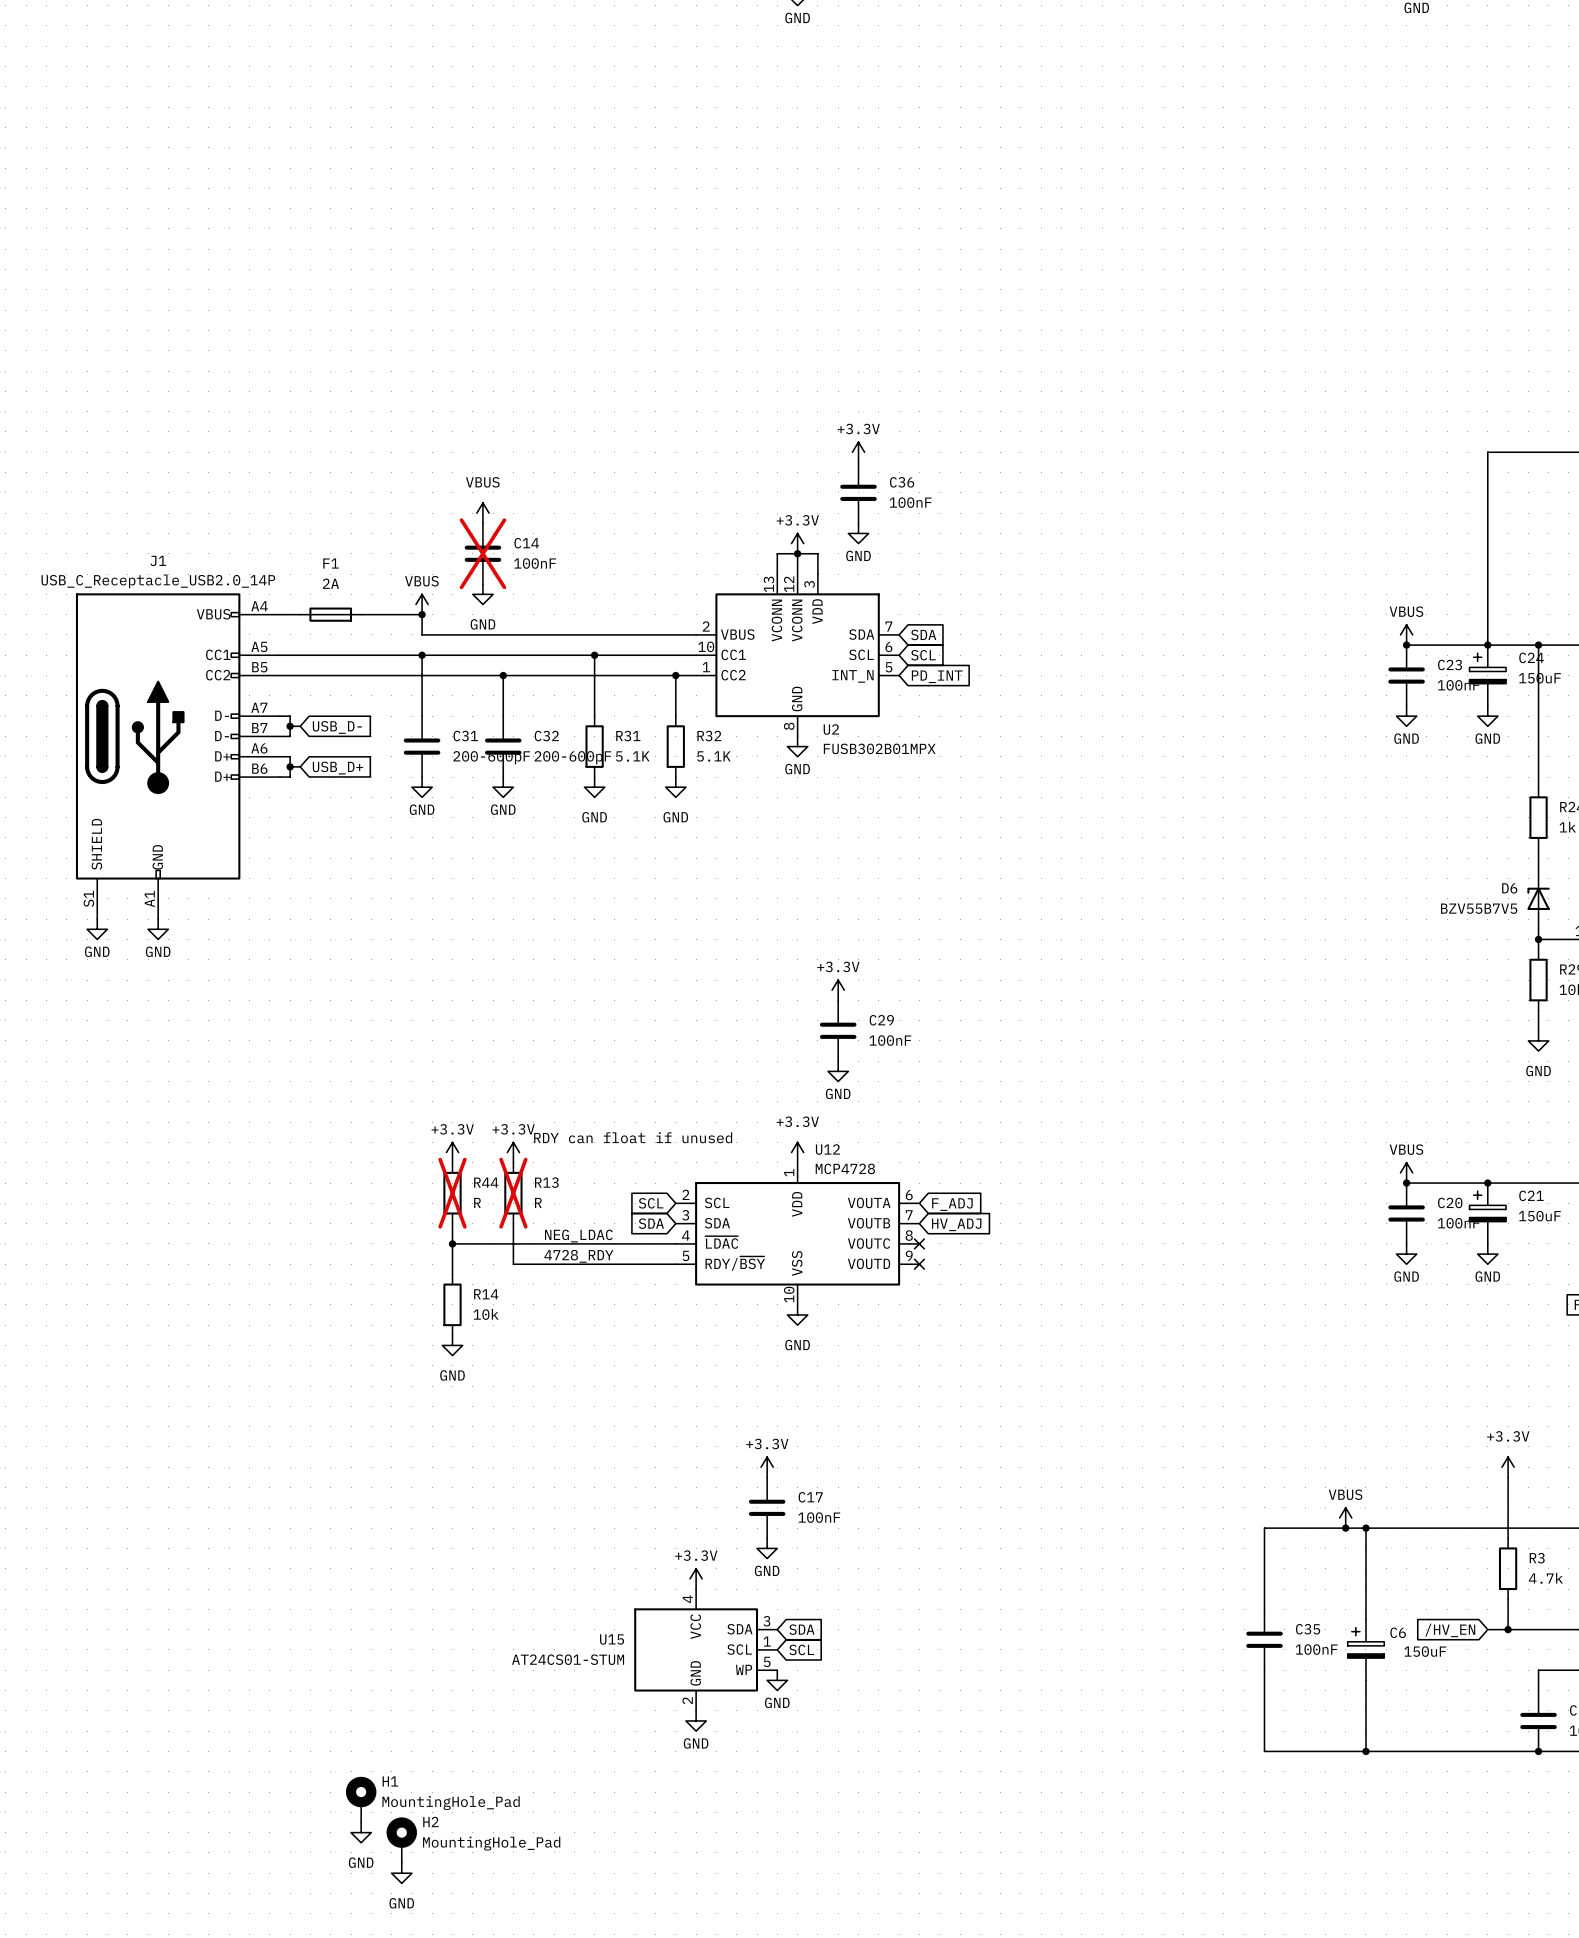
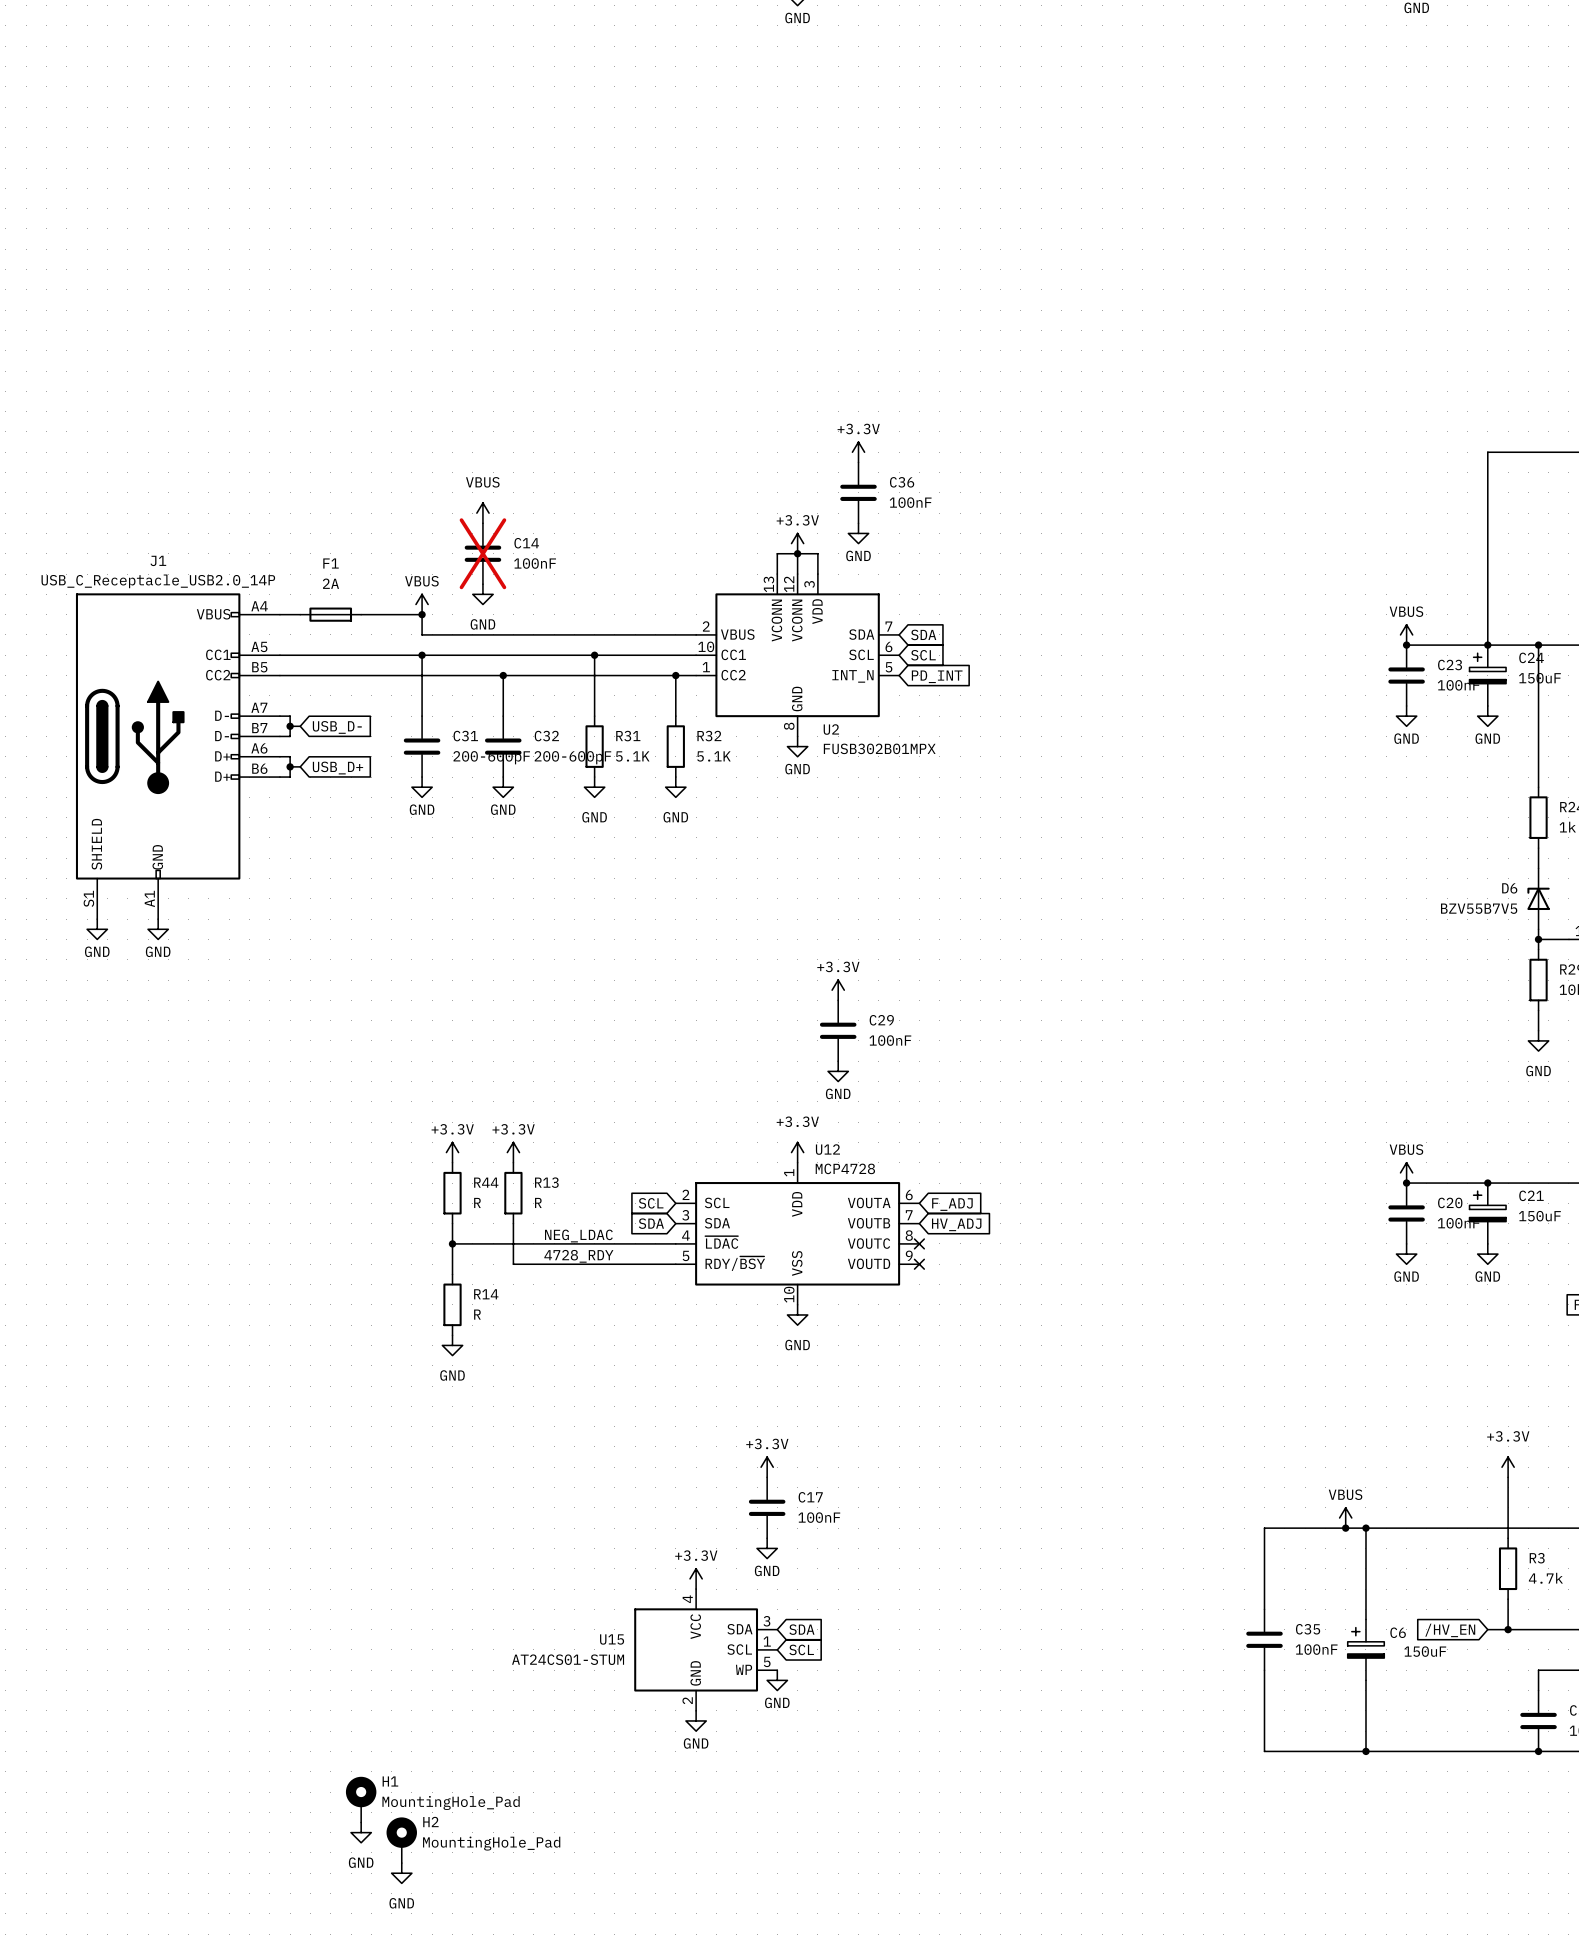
text: RDY can float if unused (633, 1137) -> none
R44 do-not-place cross: (452, 1193) -> none
R13 do-not-place cross: (513, 1193) -> none
R14 value: 10k (486, 1314) -> R (477, 1314)

